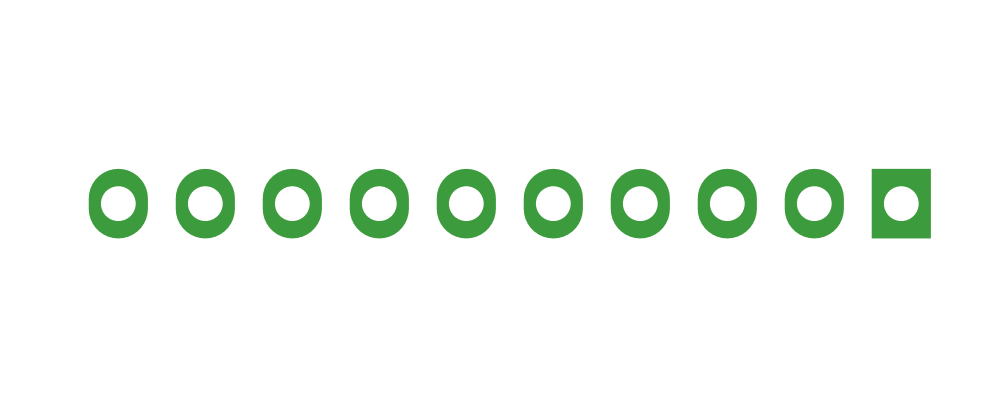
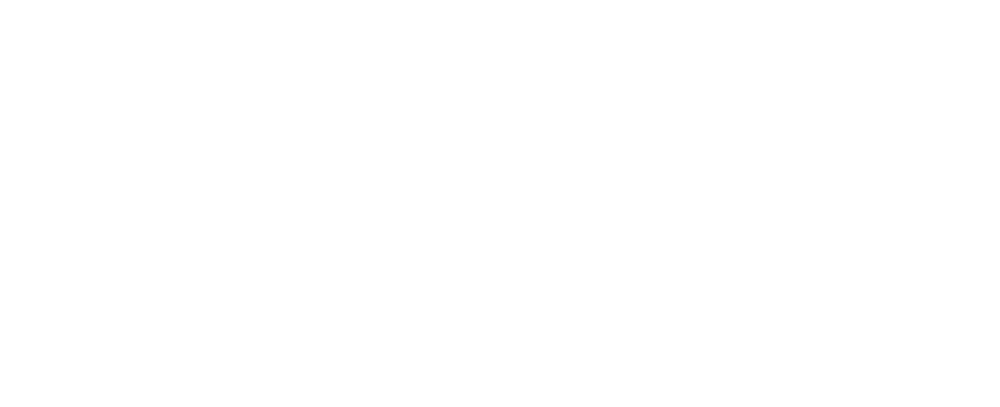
part: (509, 203) -> none

